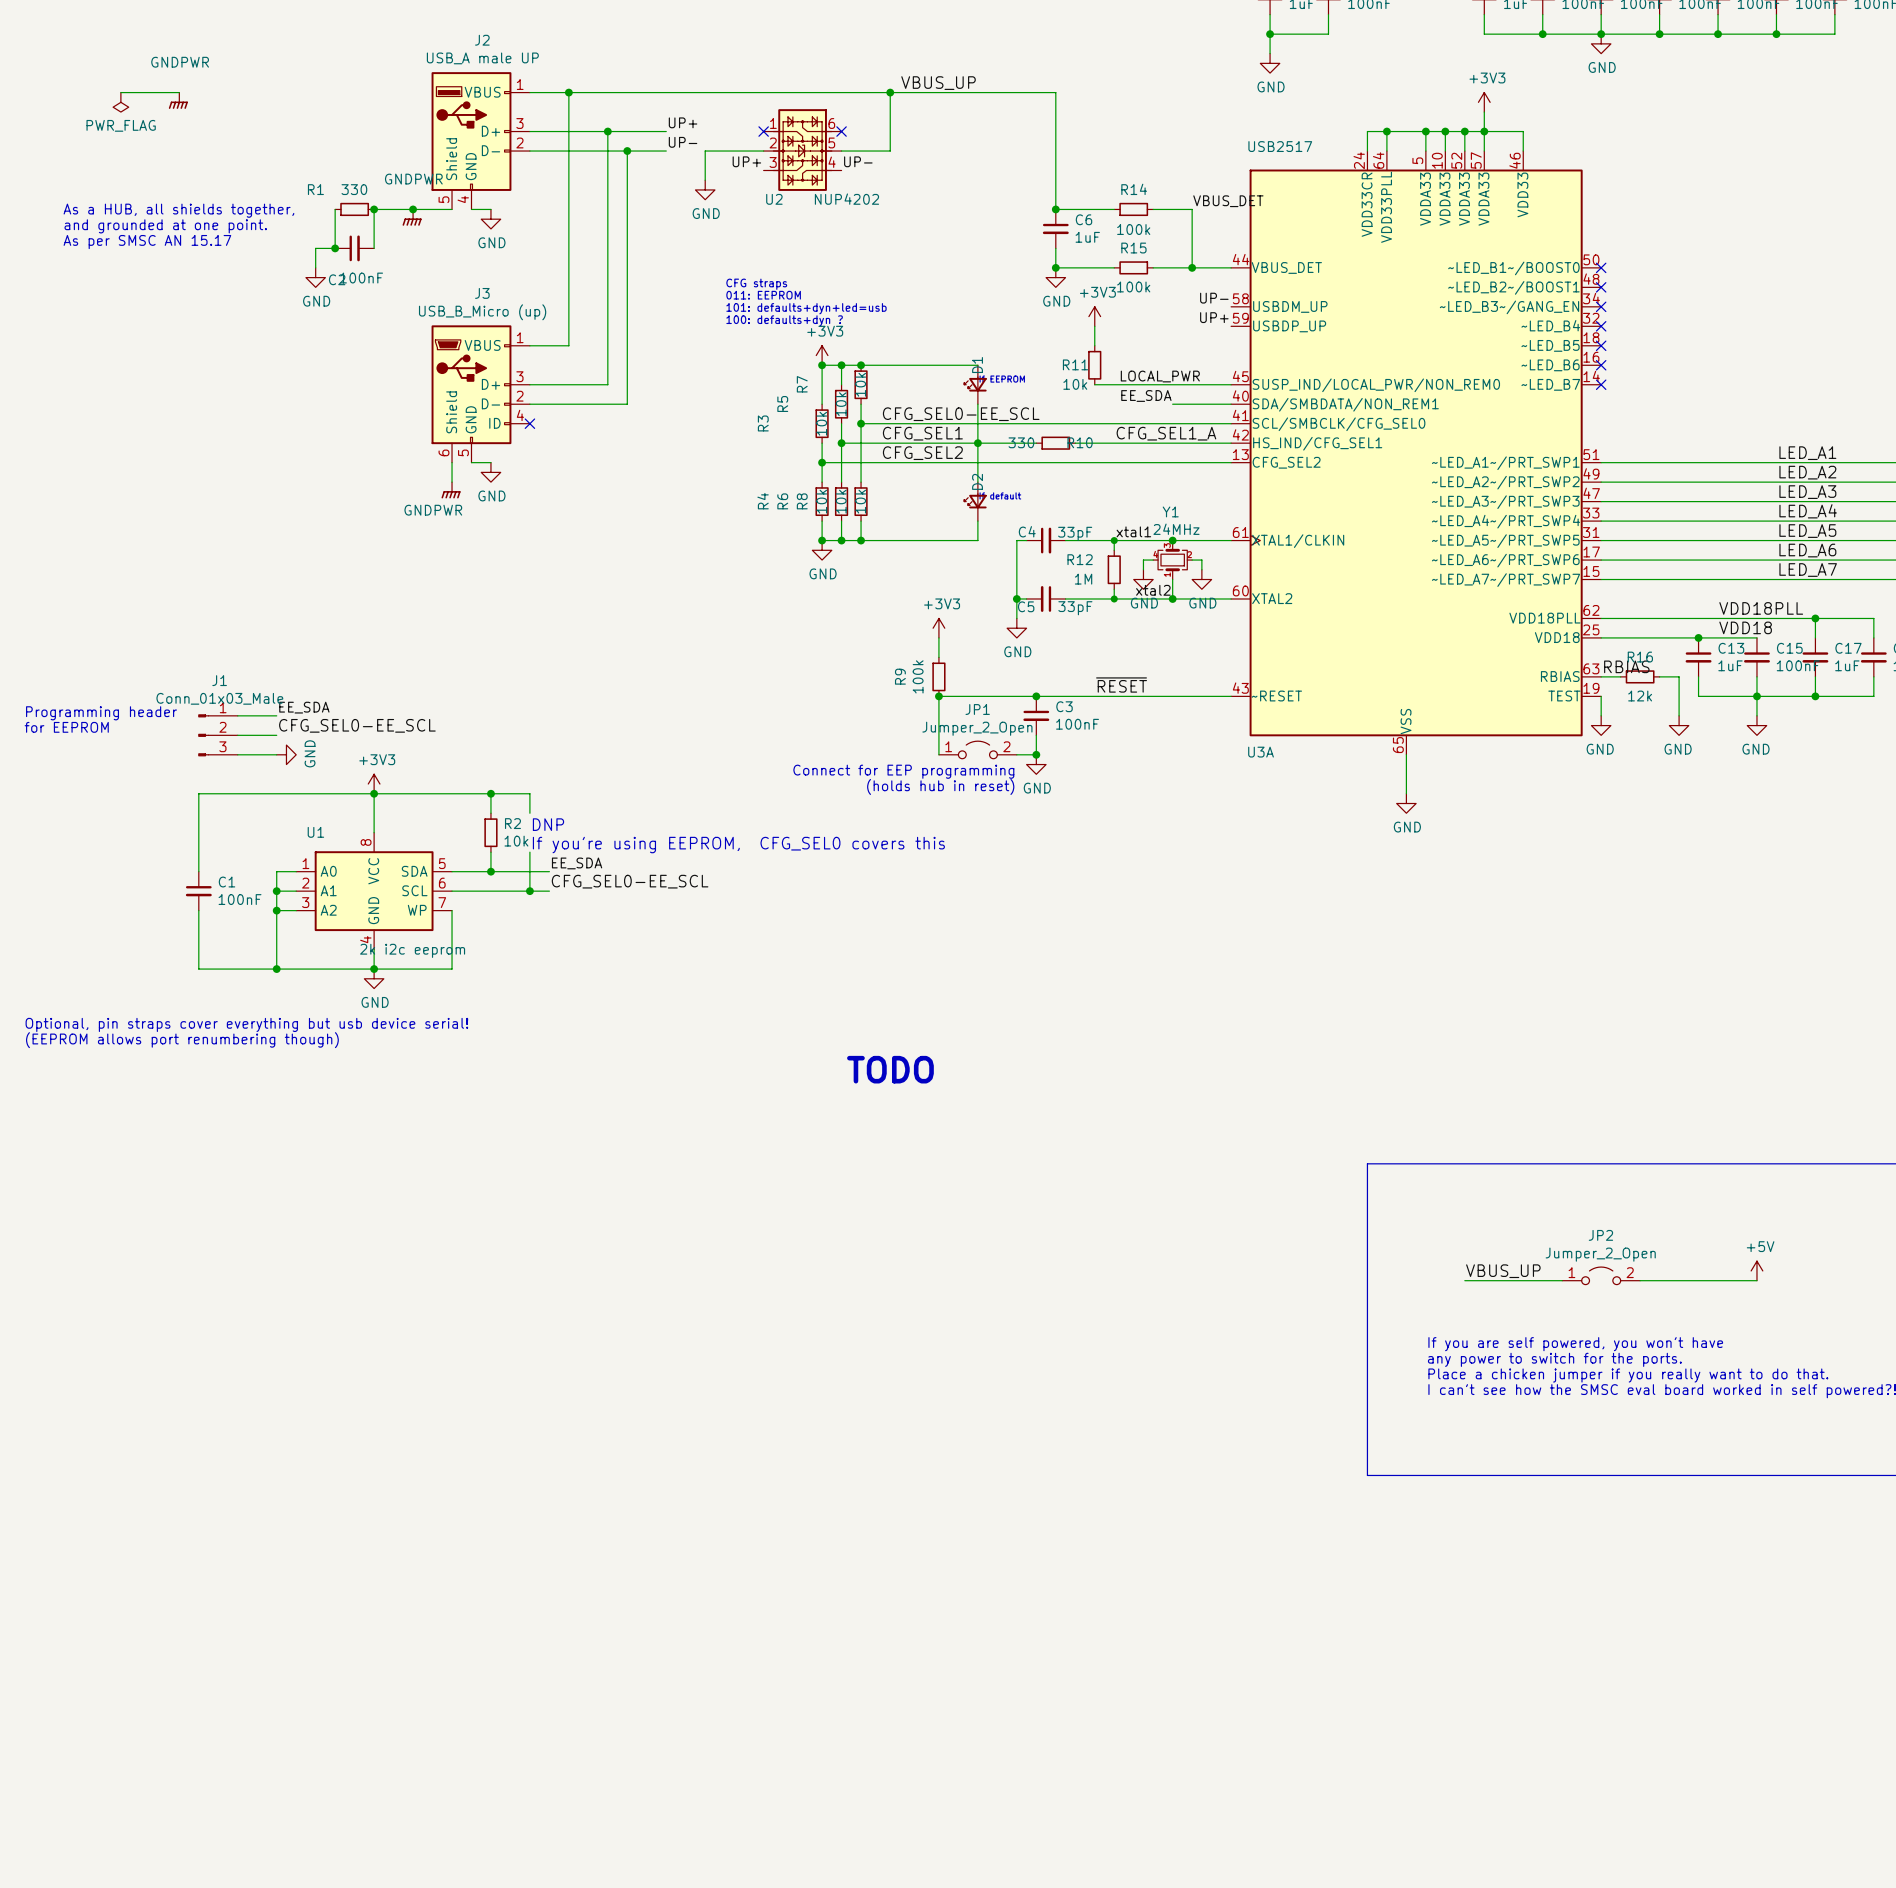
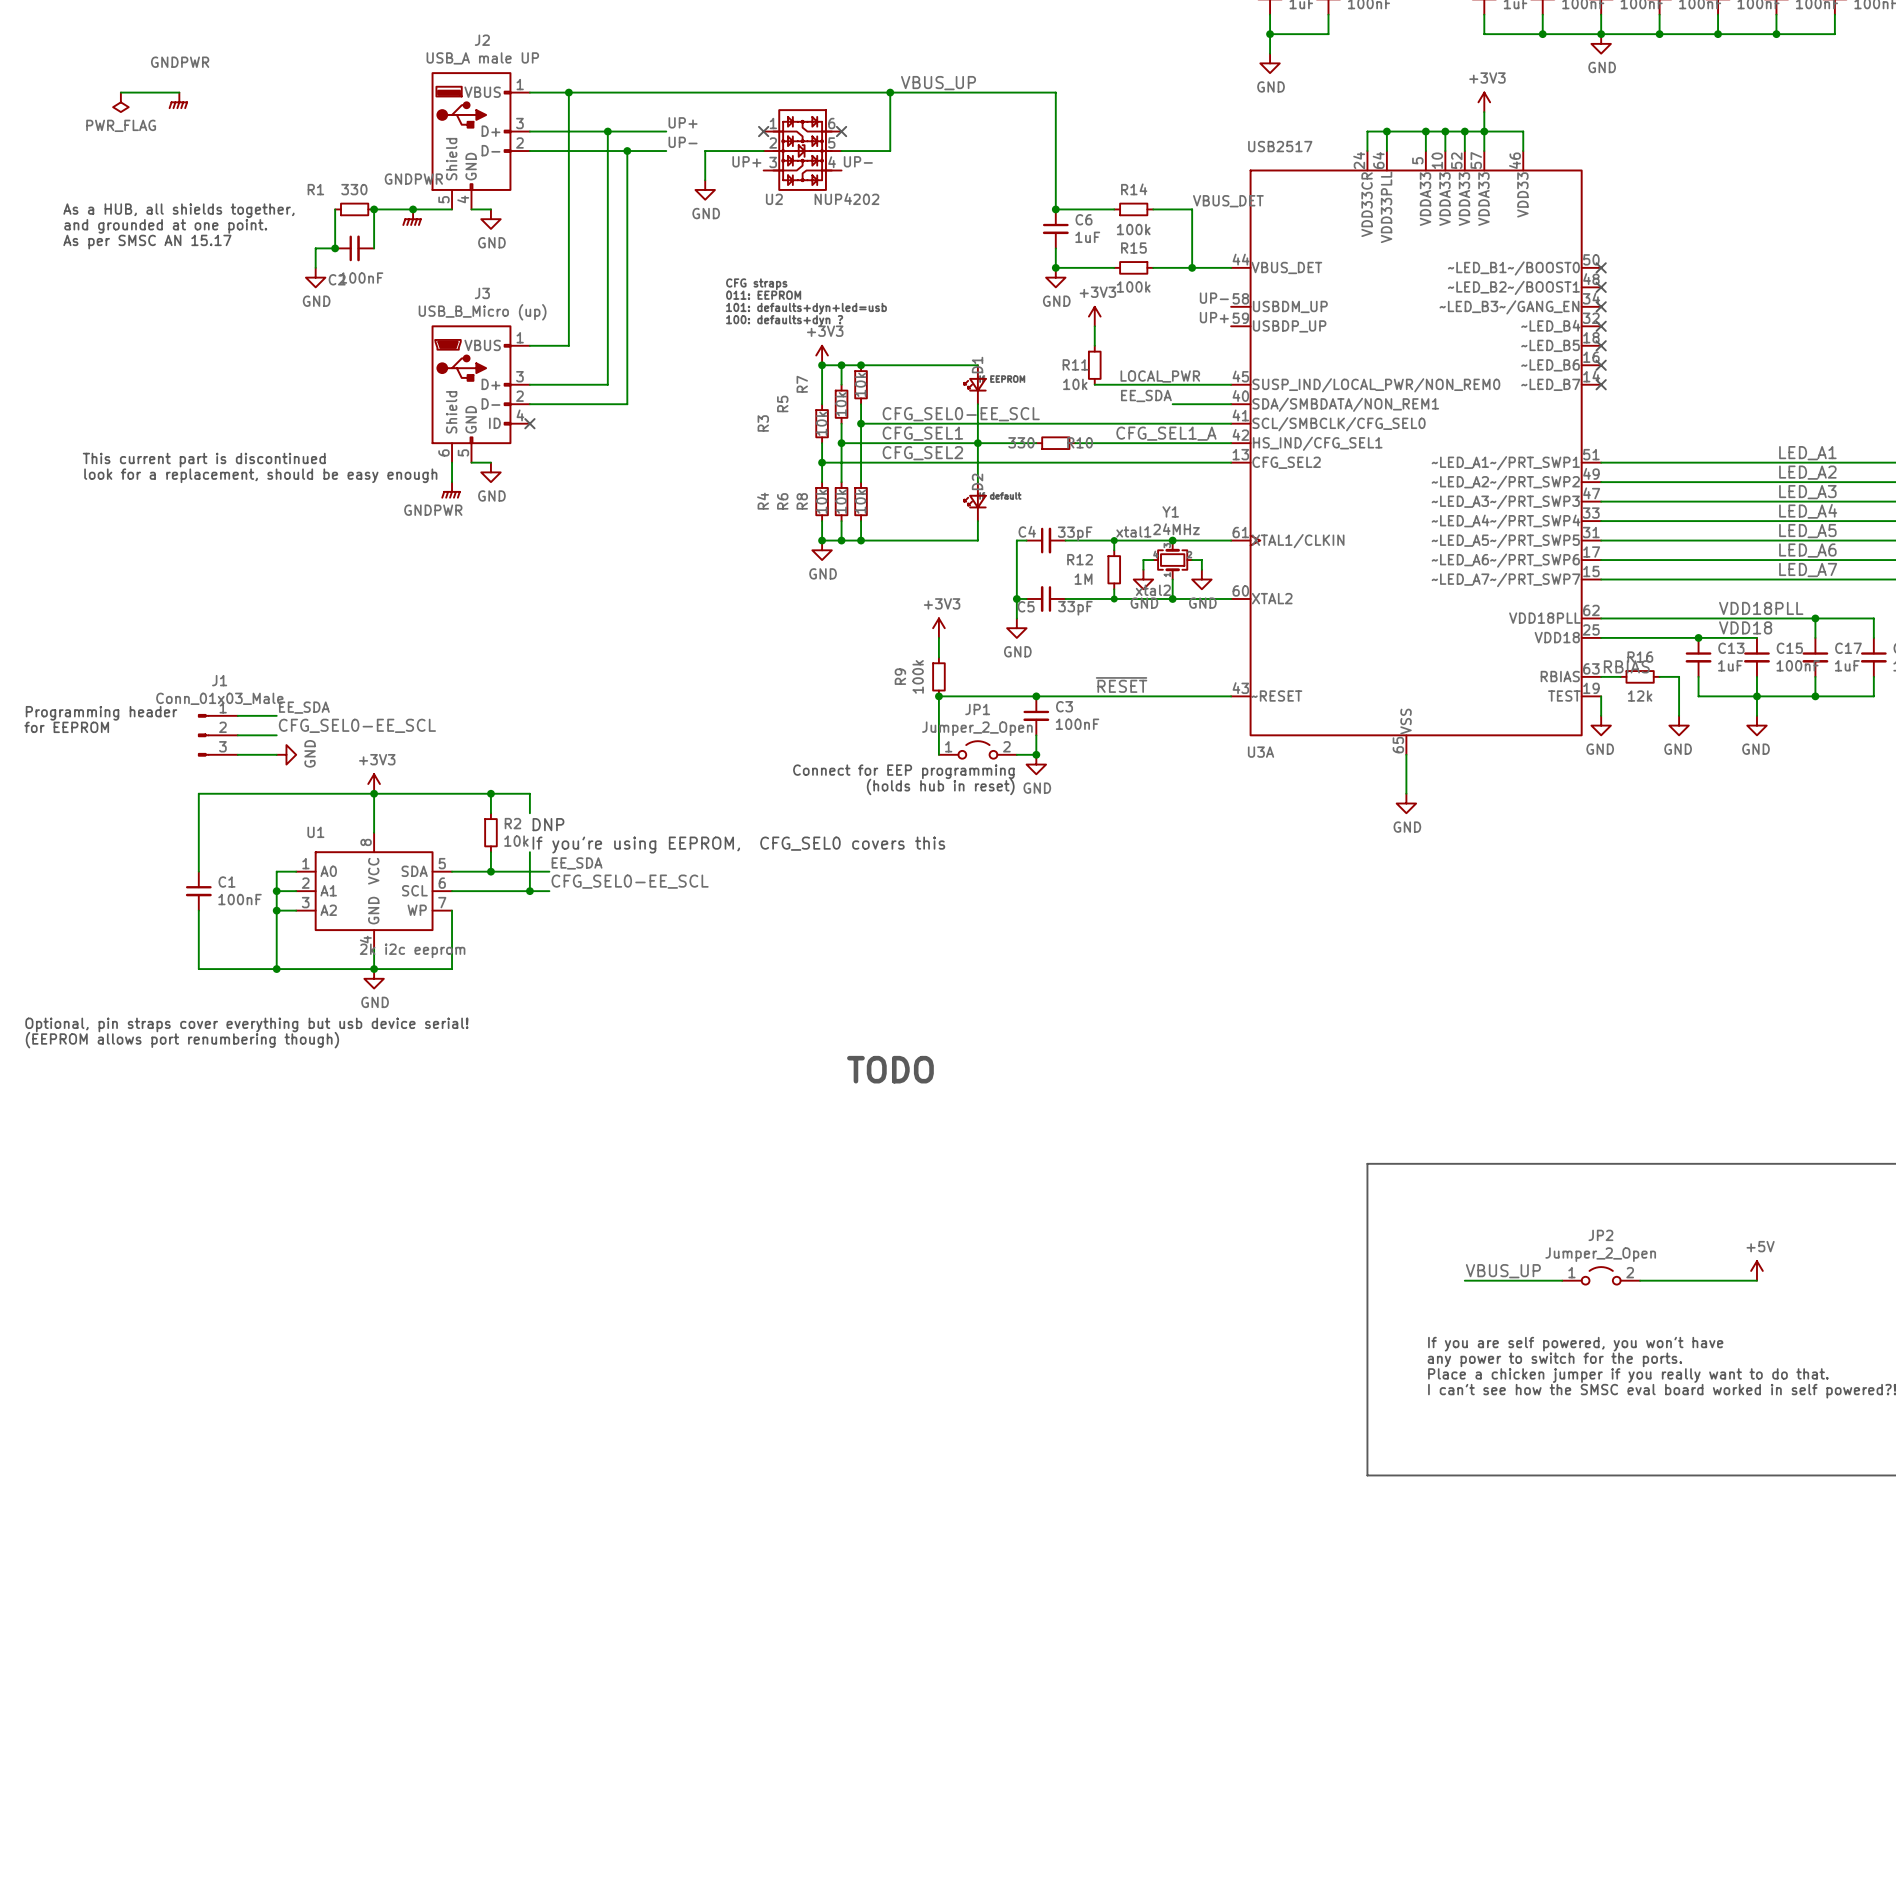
text: none -> This current part is discontinued (204, 460)
text: none -> look for a replacement, should be easy enough (260, 475)

